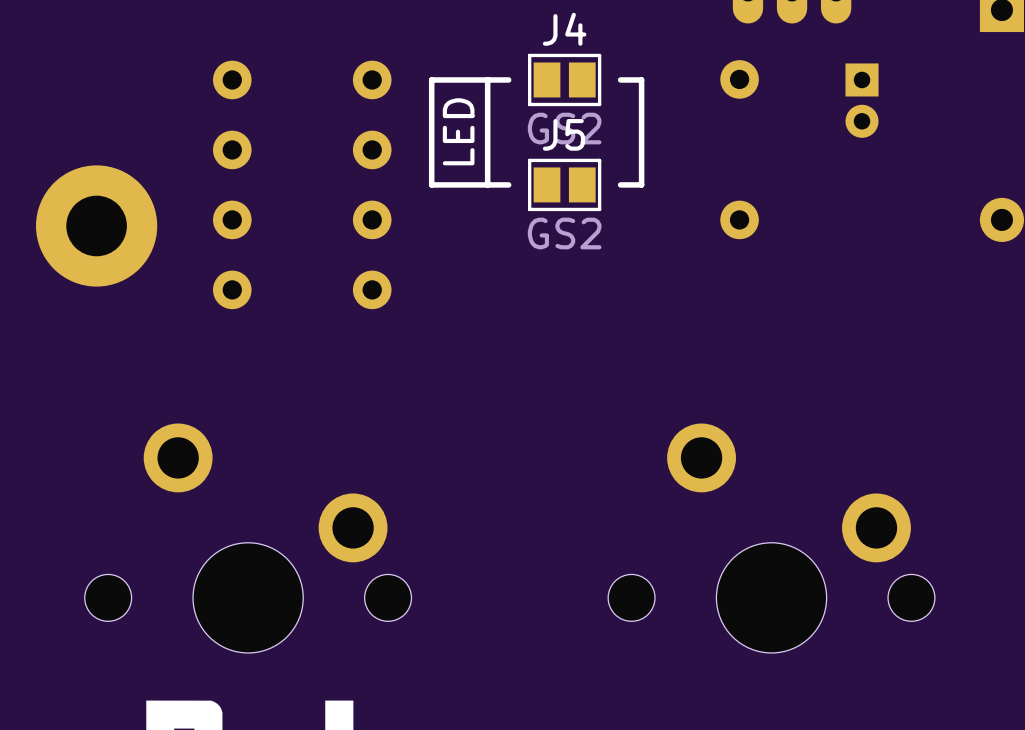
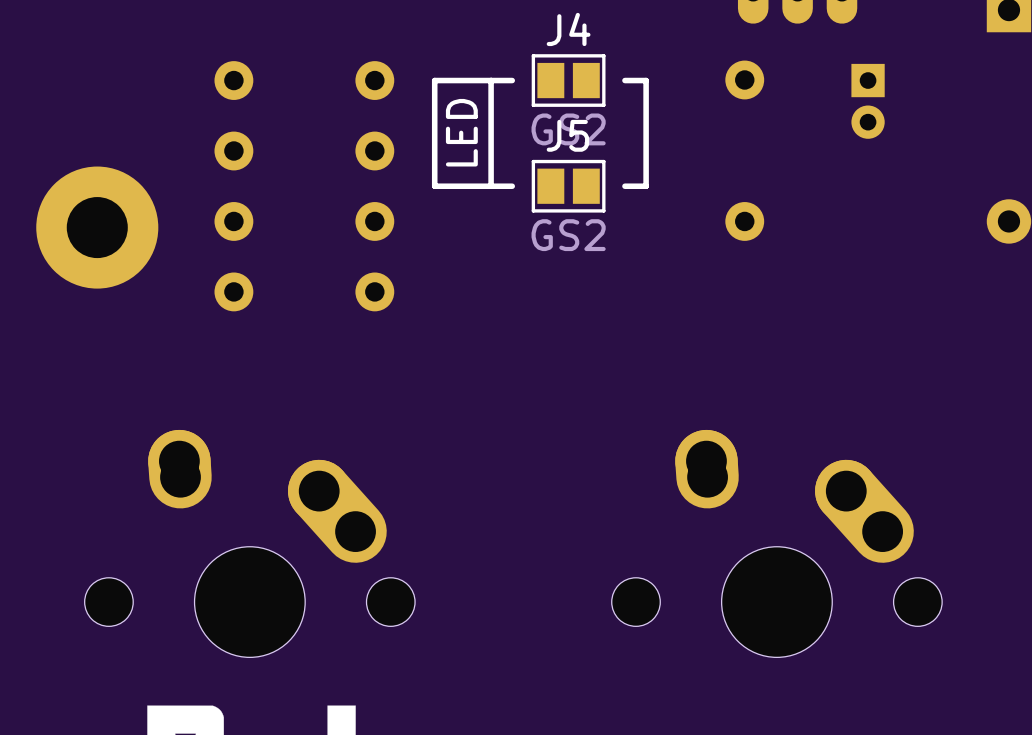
part footprint: [84, 423, 412, 653] -> [84, 429, 416, 658]
part footprint: [608, 423, 935, 653] -> [611, 429, 943, 658]

